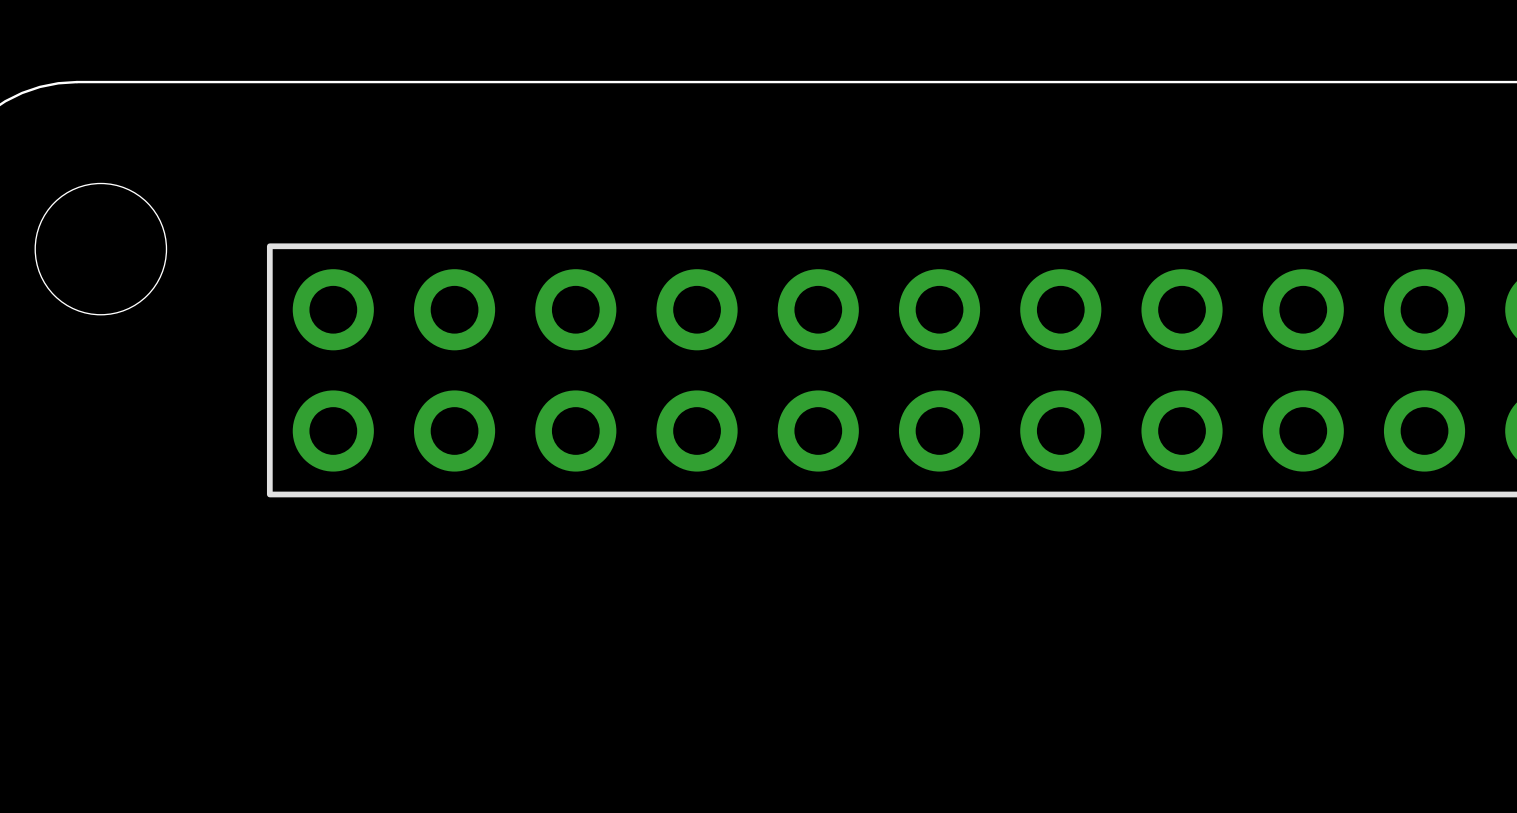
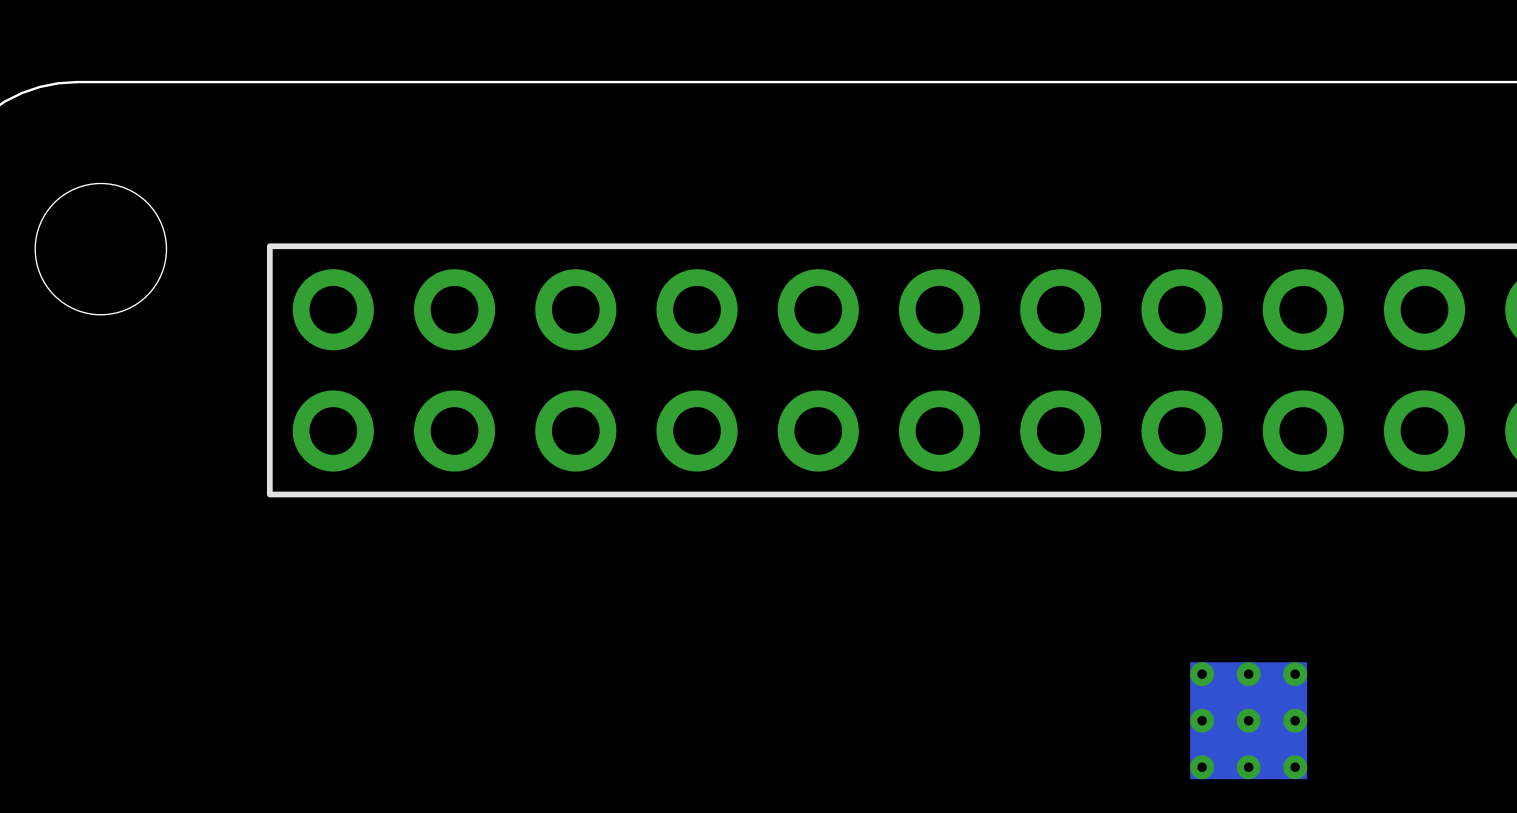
part: none -> (1248, 720)

